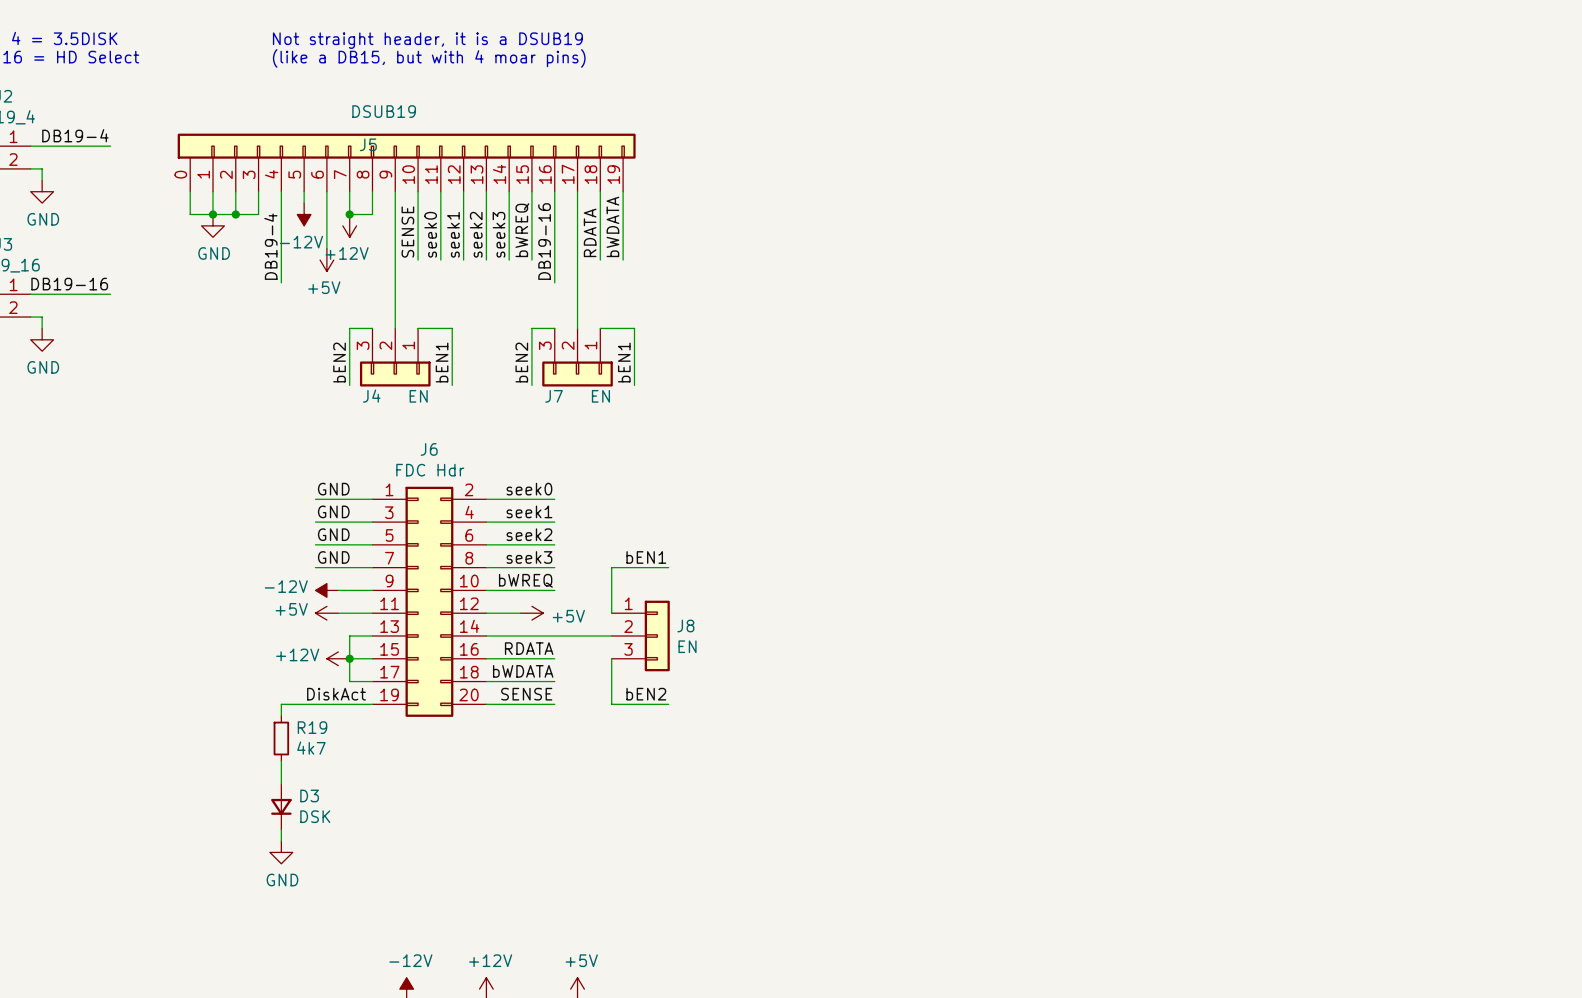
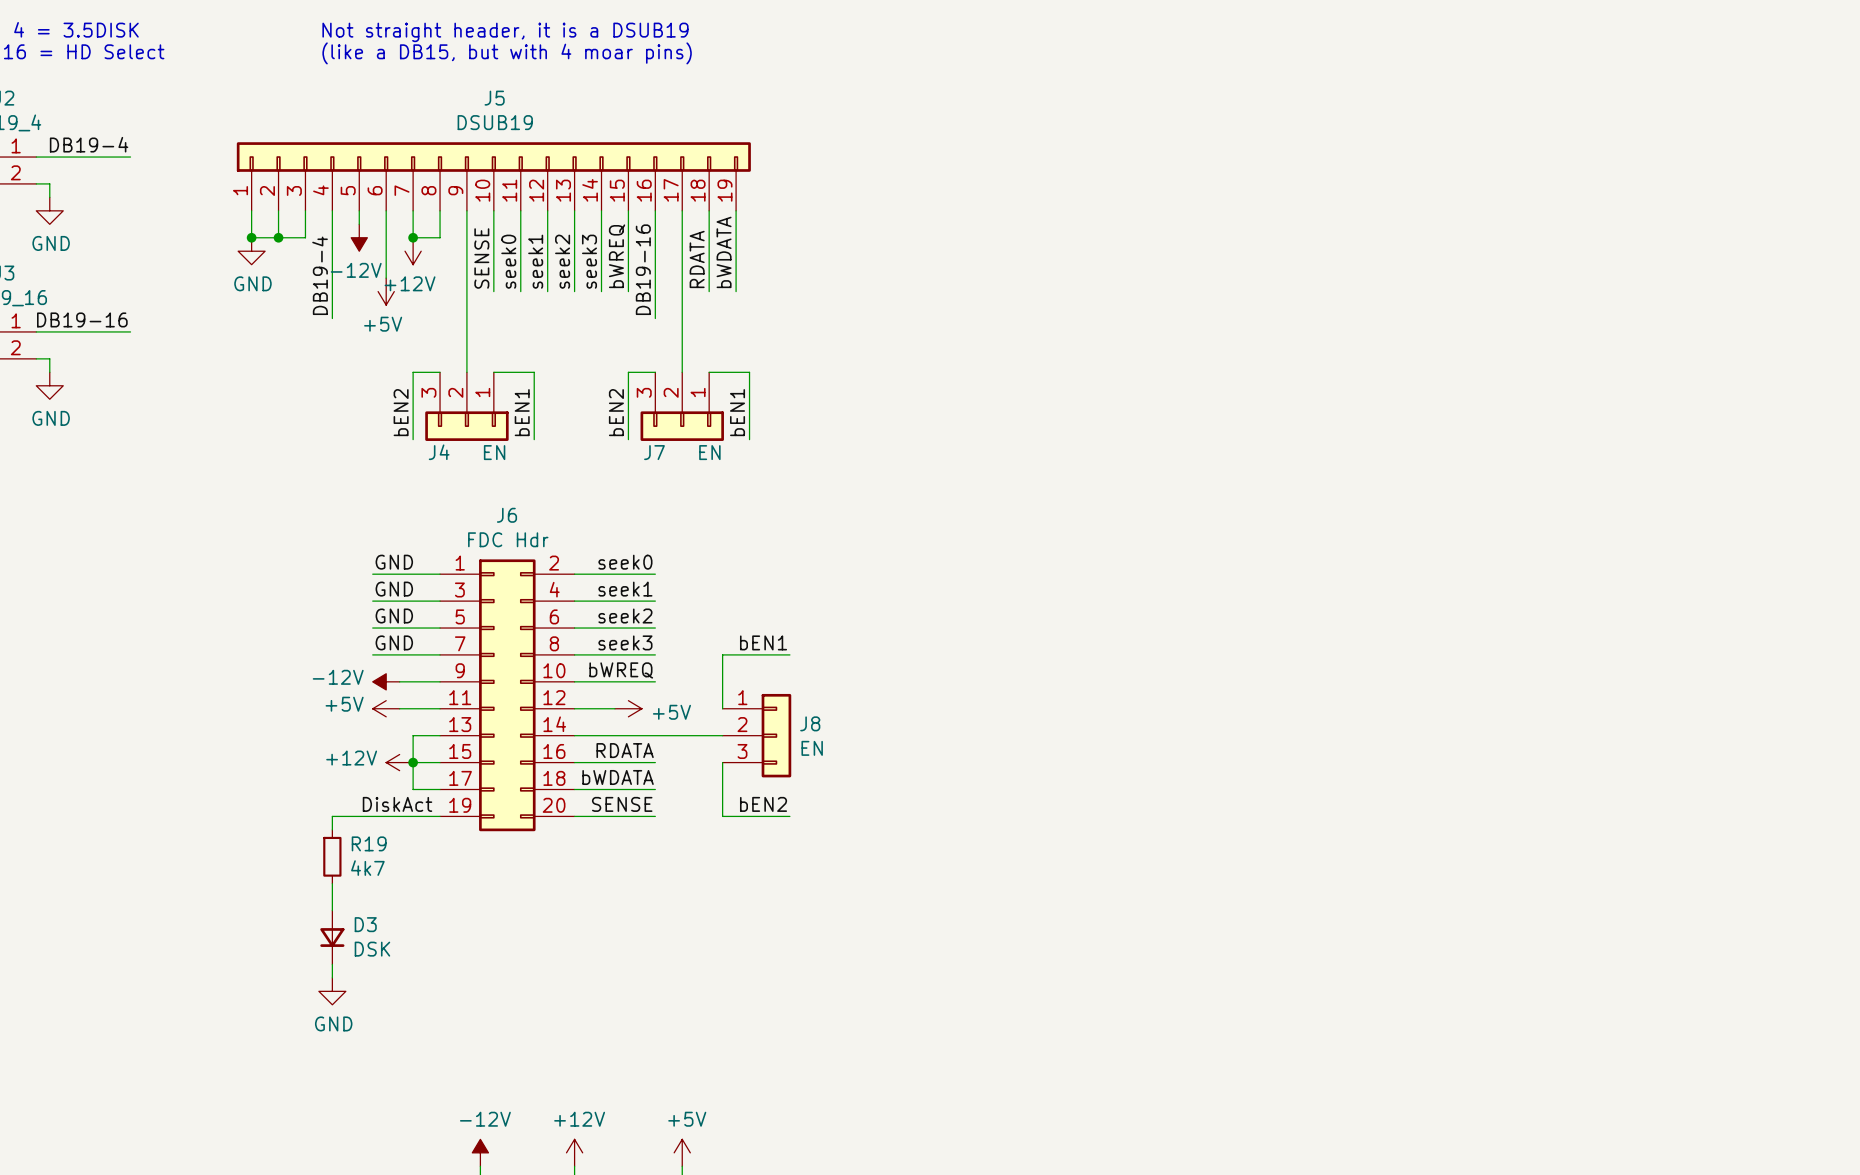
J5 value position: DSUB19 (384, 111) -> DSUB19 (495, 122)
J5 symbol: [177, 133, 636, 192] -> [236, 142, 751, 211]
J5 name position: J5 (368, 144) -> J5 (494, 98)
wire: (190, 191) (190, 214) (213, 214) -> none

